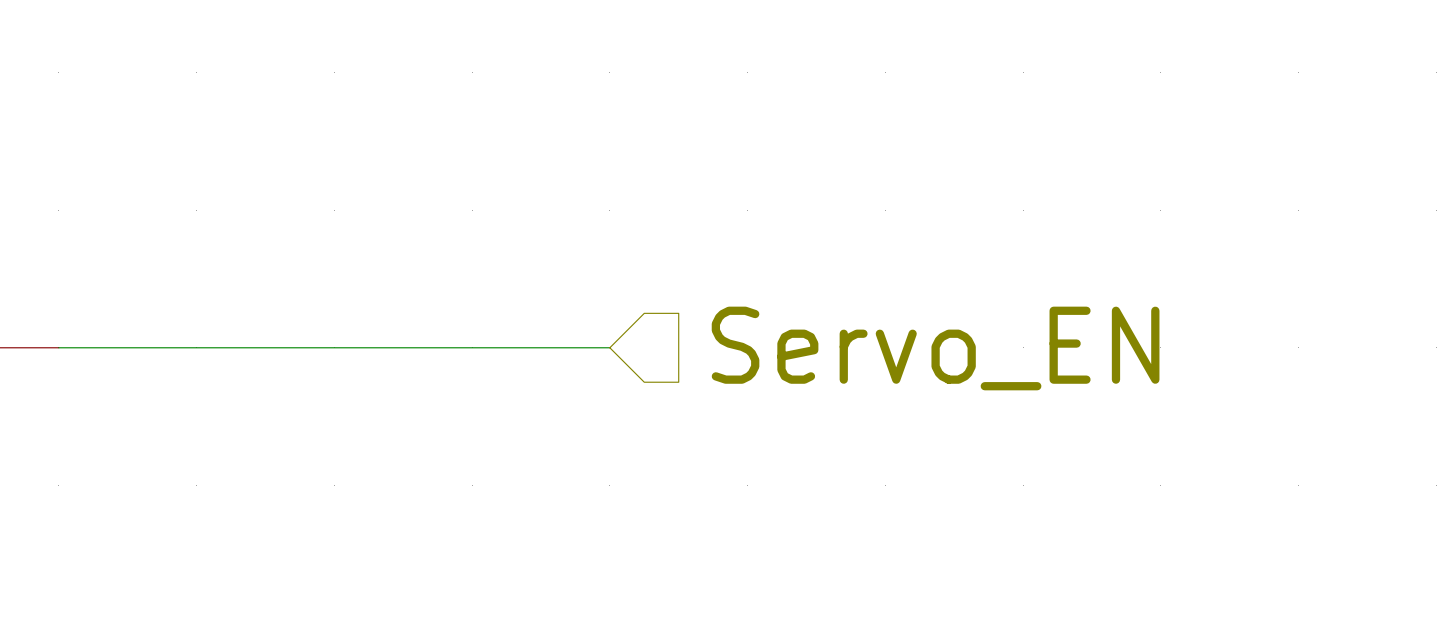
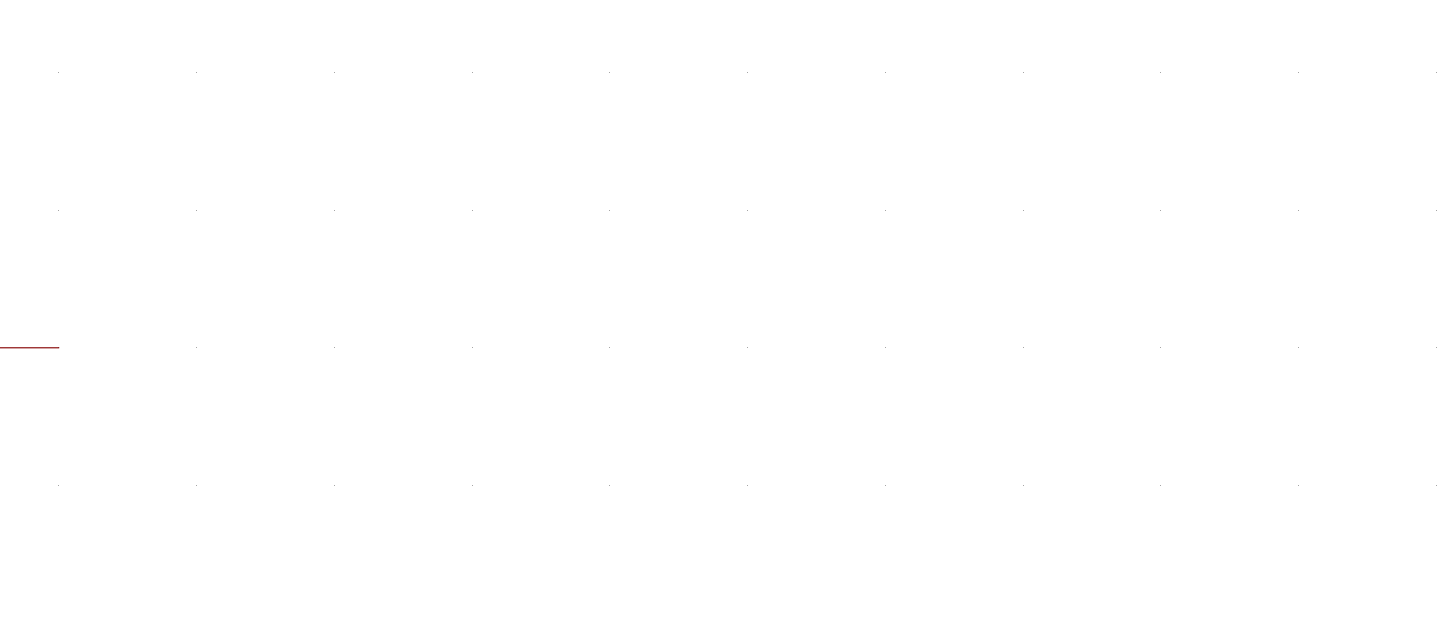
wire: (58, 347) (609, 347) -> none
hierarchical label: Servo_EN (935, 348) -> none

